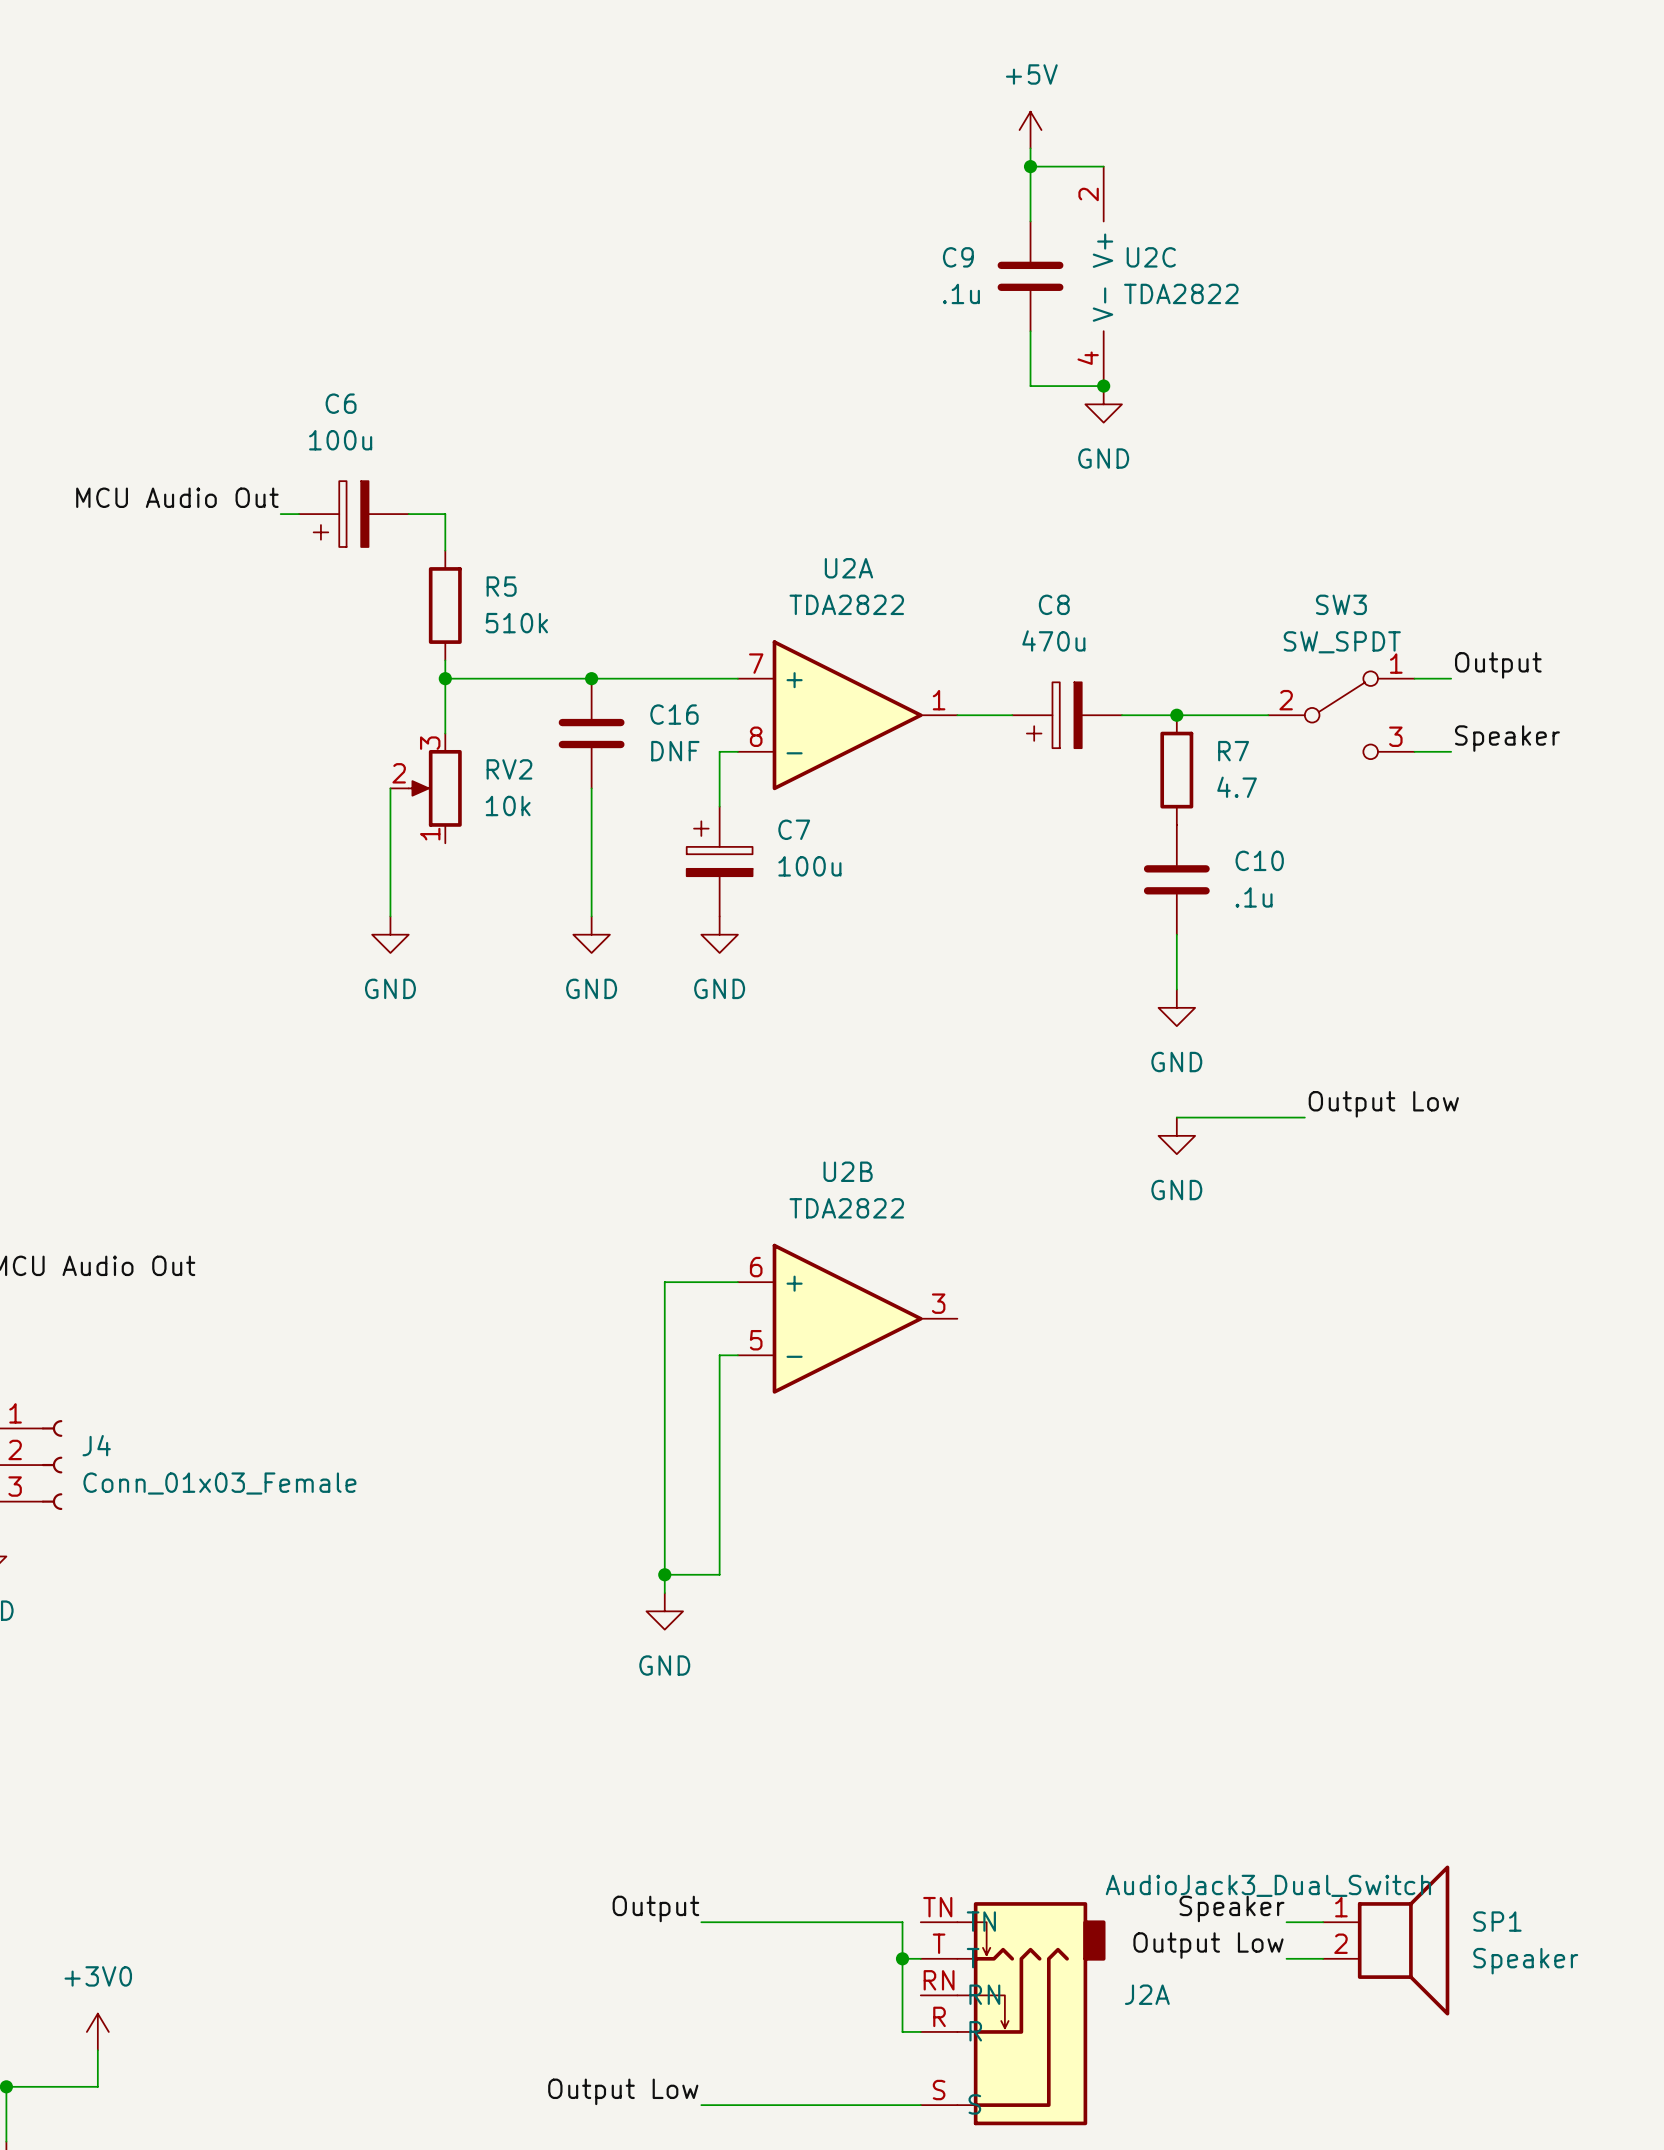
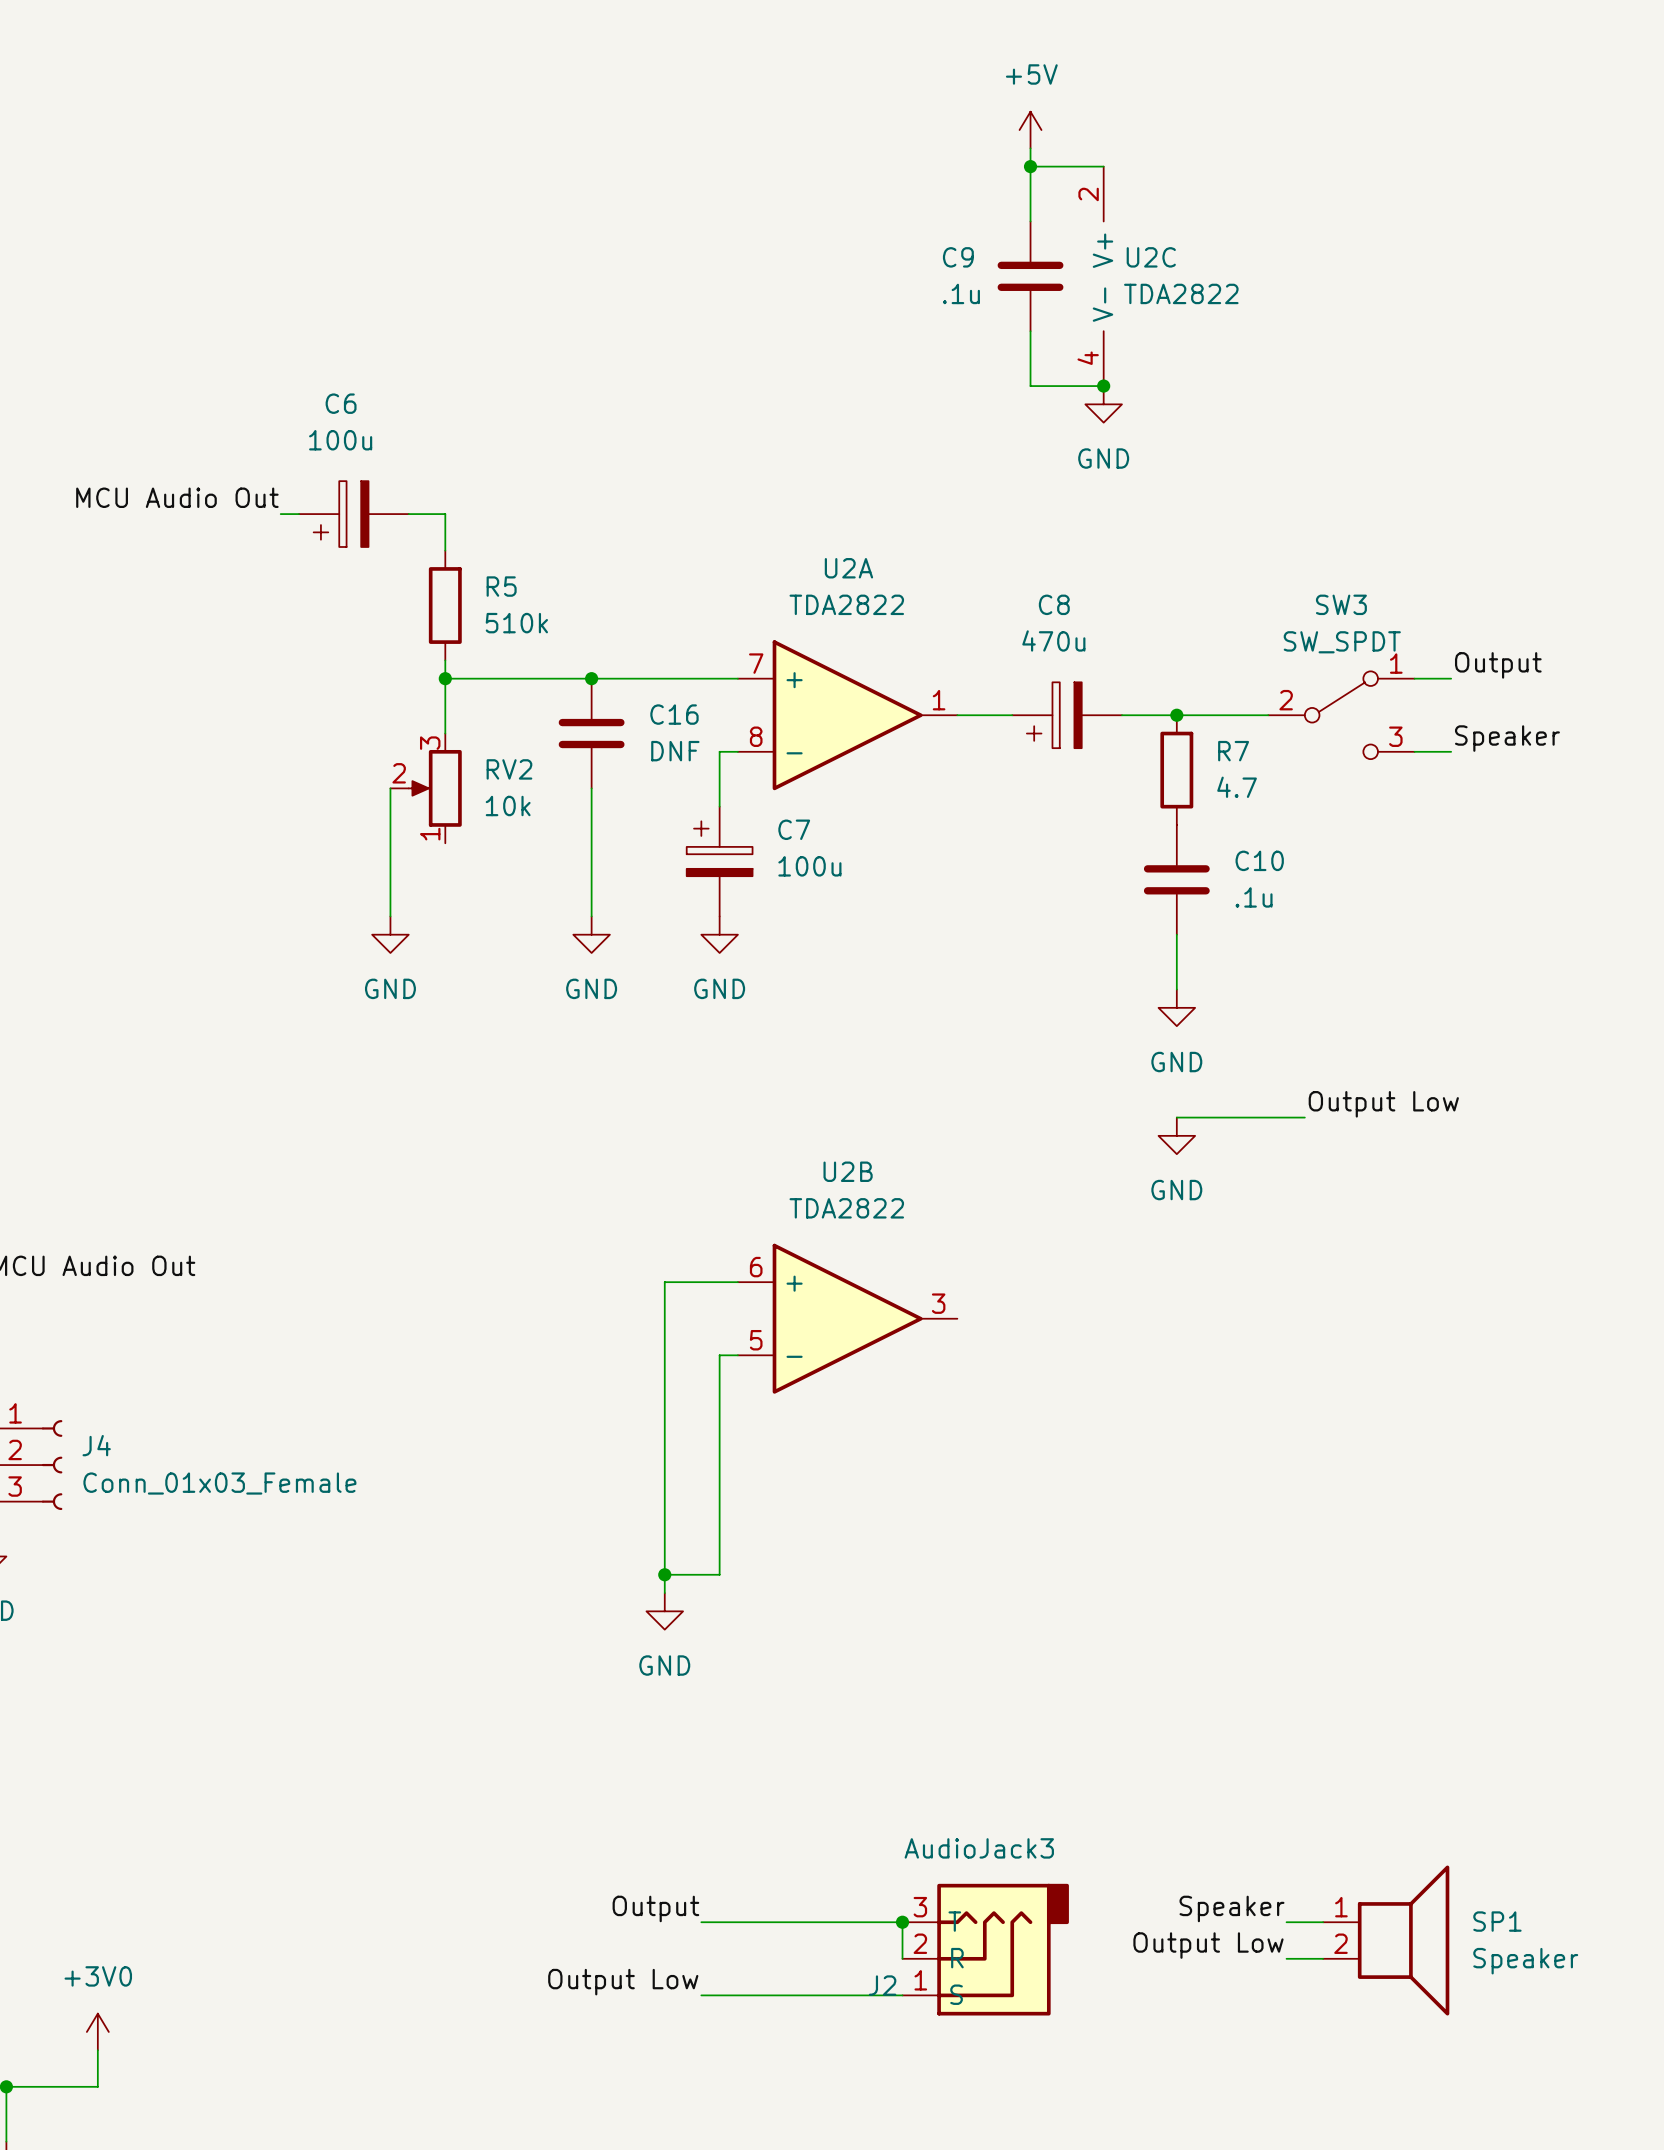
J2: none -> AudioJack3 (985, 1949)
junction position: (902, 1958) -> (902, 1922)
wire: (920, 1958) (902, 1958) (902, 2031) (920, 2031) -> none
wire: none -> (701, 1995) (902, 1995)
J2A: AudioJack3_Dual_Switch (1013, 2013) -> none
label position: Output Low (623, 2091) -> Output Low (623, 1982)
wire: (701, 2105) (920, 2105) -> none

